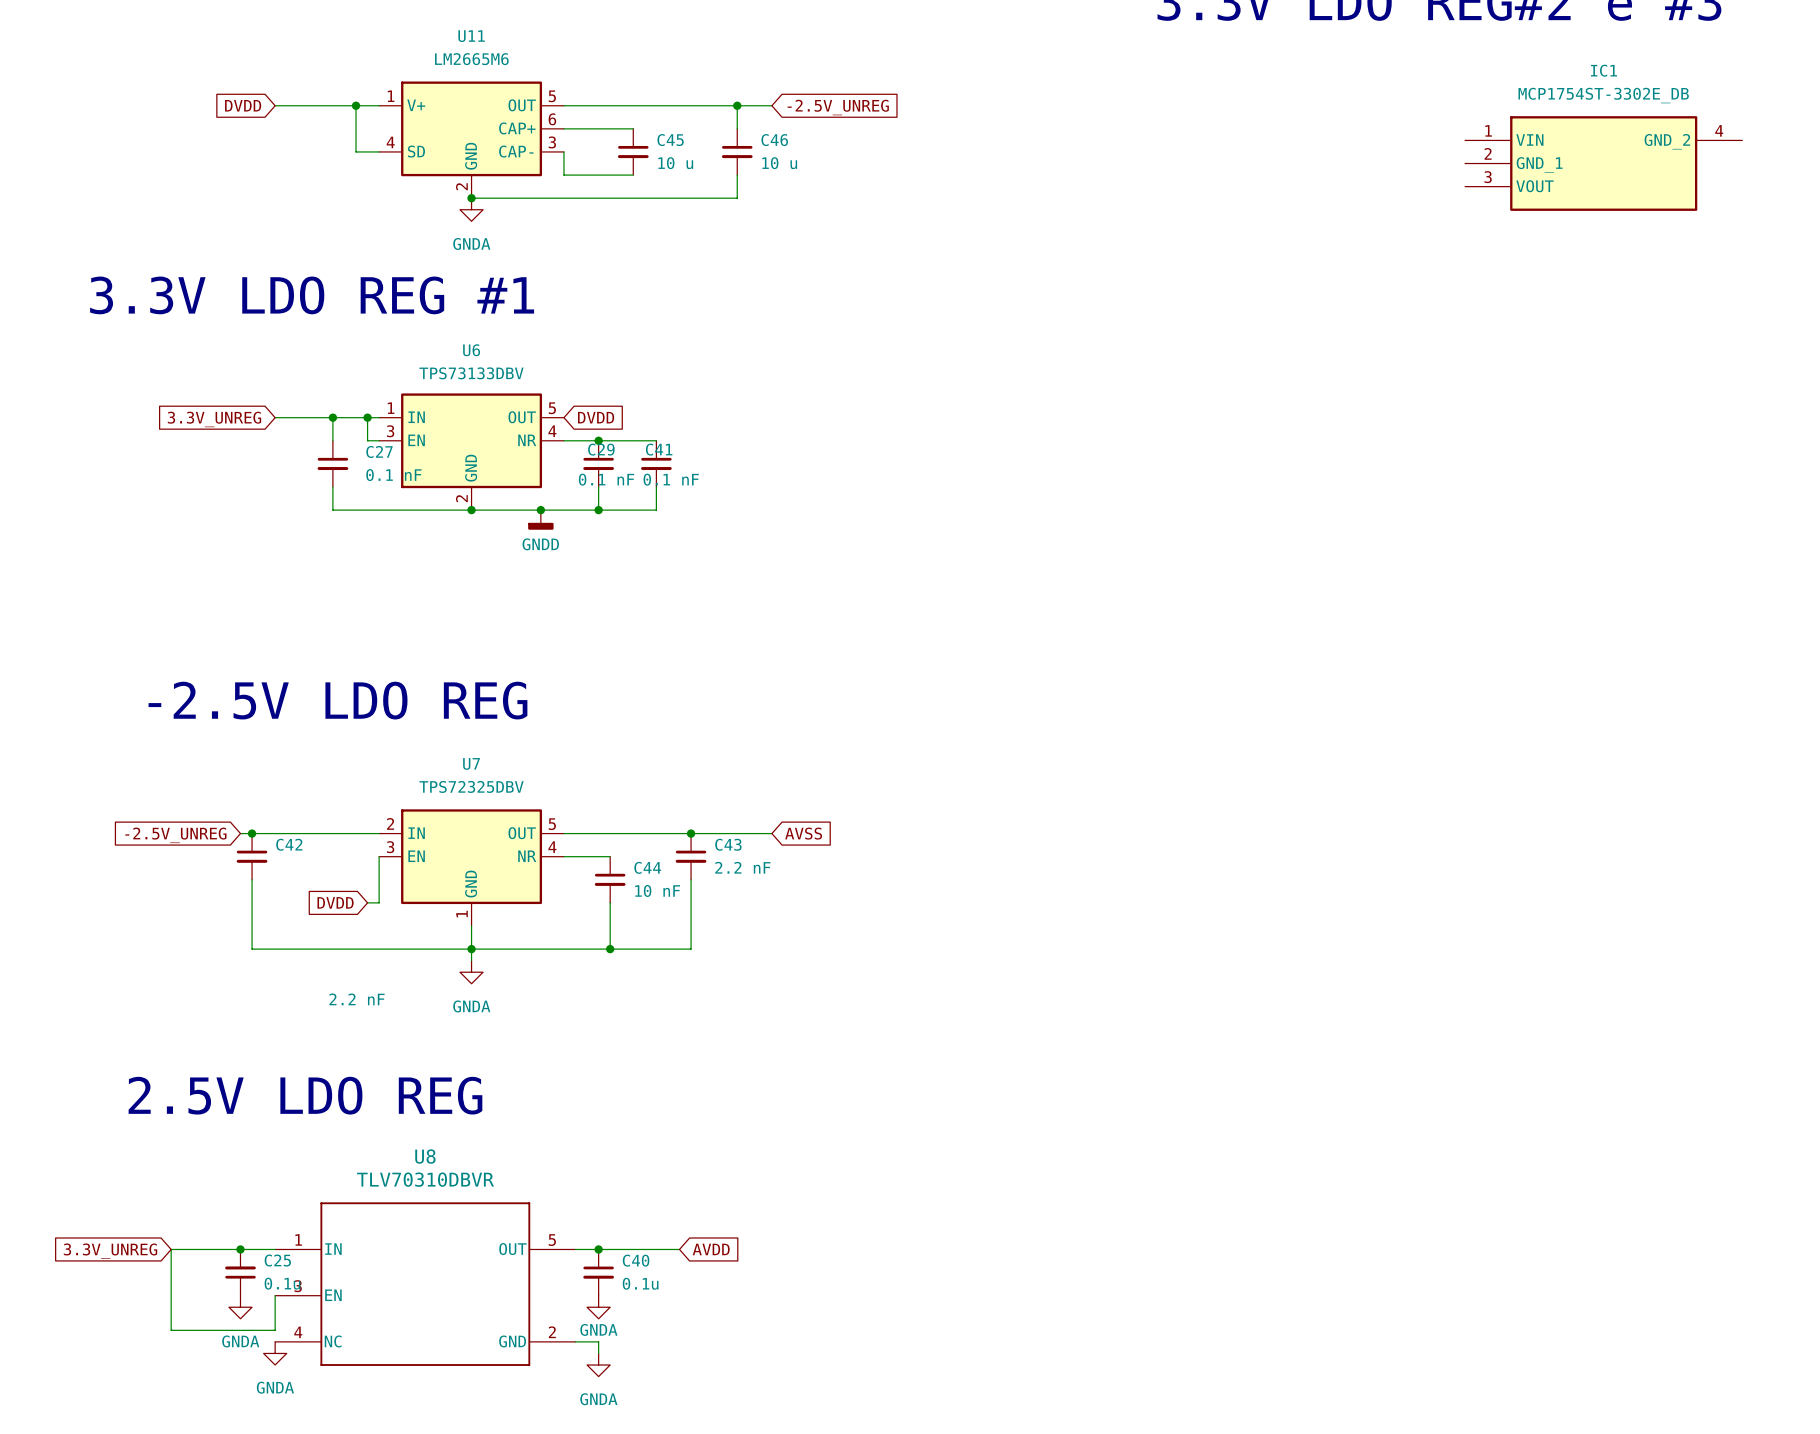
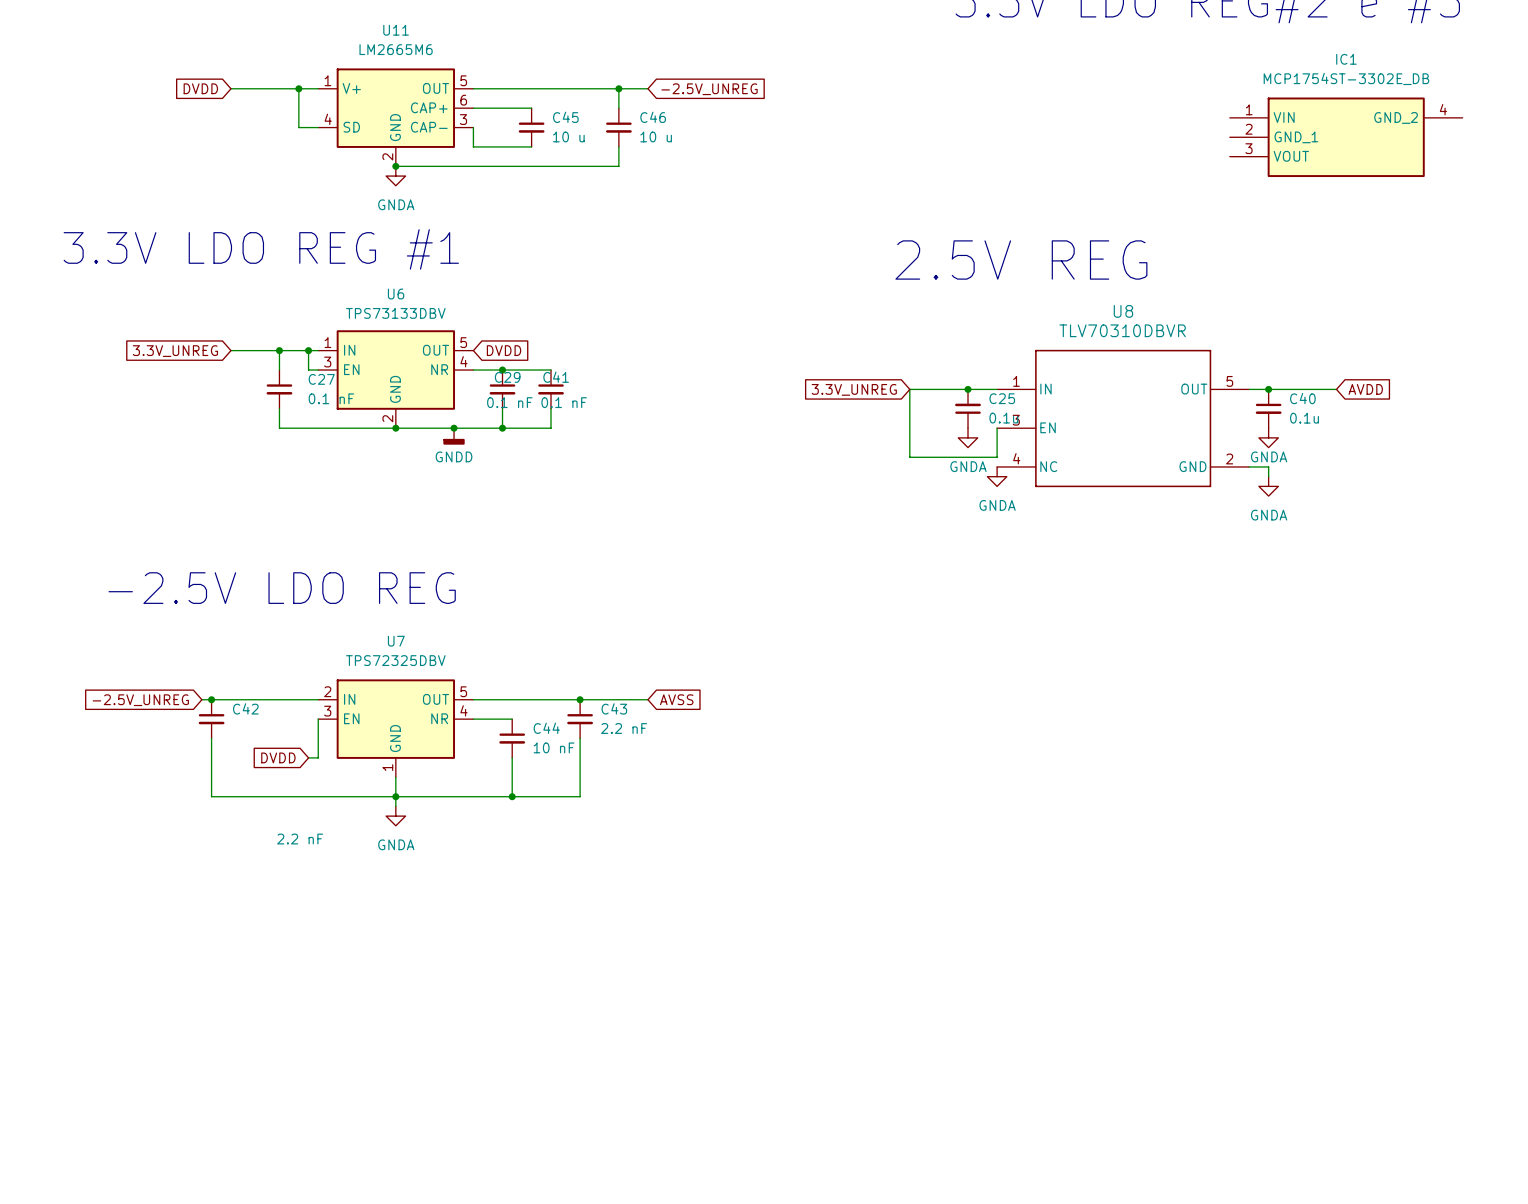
text: none -> 2.5V REG (1021, 260)
junction: none -> (968, 389)
wire: none -> (997, 389) (909, 389) (909, 457) (997, 457) (997, 428)
wire: none -> (1249, 389) (1336, 389)
junction: none -> (1268, 389)
global label: none -> AVDD (1365, 389)
global label: none -> 3.3V_UNREG (854, 389)
power symbol: none -> GNDA (968, 437)
power symbol: none -> GNDA (1268, 437)
wire: none -> (1249, 466) (1268, 466) (1268, 476)
power symbol: none -> GNDA (997, 476)
power symbol: none -> GNDA (1268, 486)
text: 2.5V LDO REG (305, 1095) -> none
junction: (240, 1249) -> none
wire: (275, 1249) (171, 1249) (171, 1330) (275, 1330) (275, 1295) -> none
wire: (575, 1249) (679, 1249) -> none
junction: (598, 1249) -> none
global label: AVDD (711, 1249) -> none
global label: 3.3V_UNREG (110, 1251) -> none
C25 position: (240, 1272) -> (968, 408)
C40 position: (598, 1272) -> (1268, 408)
U8 position: (425, 1284) -> (1123, 418)
power symbol: GNDA (240, 1307) -> none
power symbol: GNDA (598, 1307) -> none
wire: (575, 1341) (598, 1341) (598, 1353) -> none
power symbol: GNDA (275, 1353) -> none
power symbol: GNDA (598, 1365) -> none

